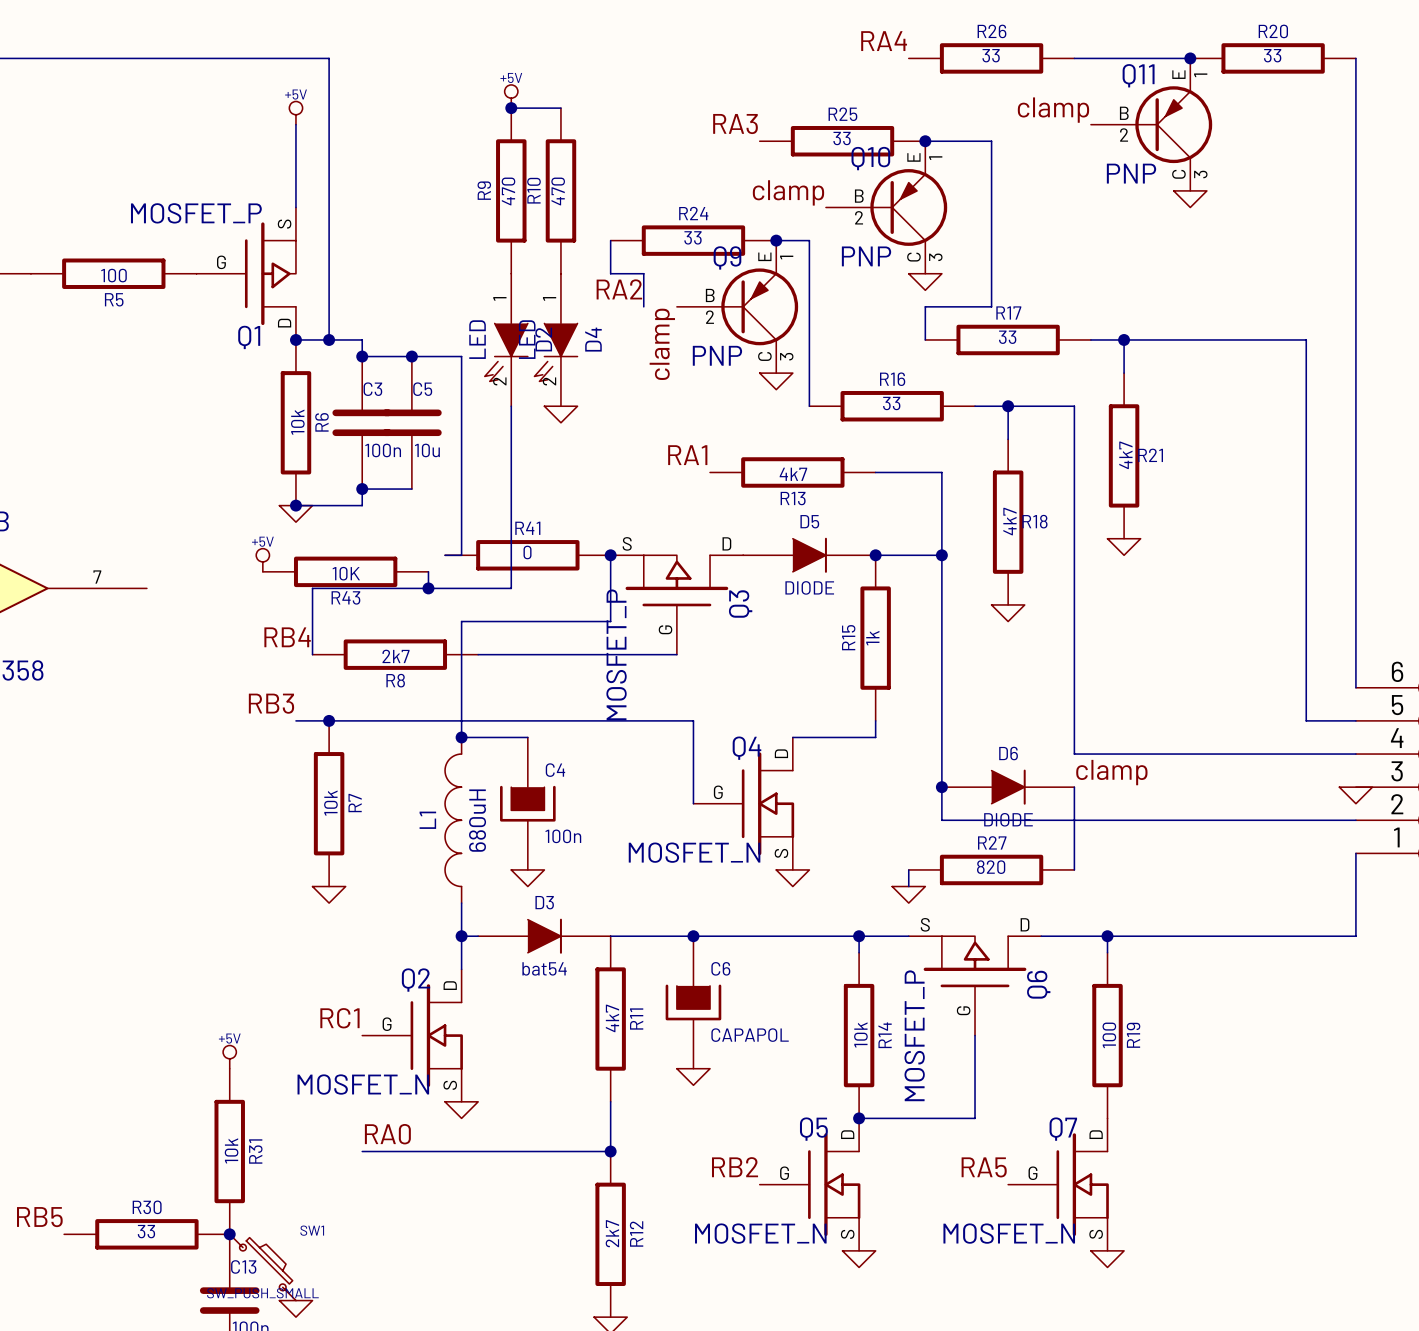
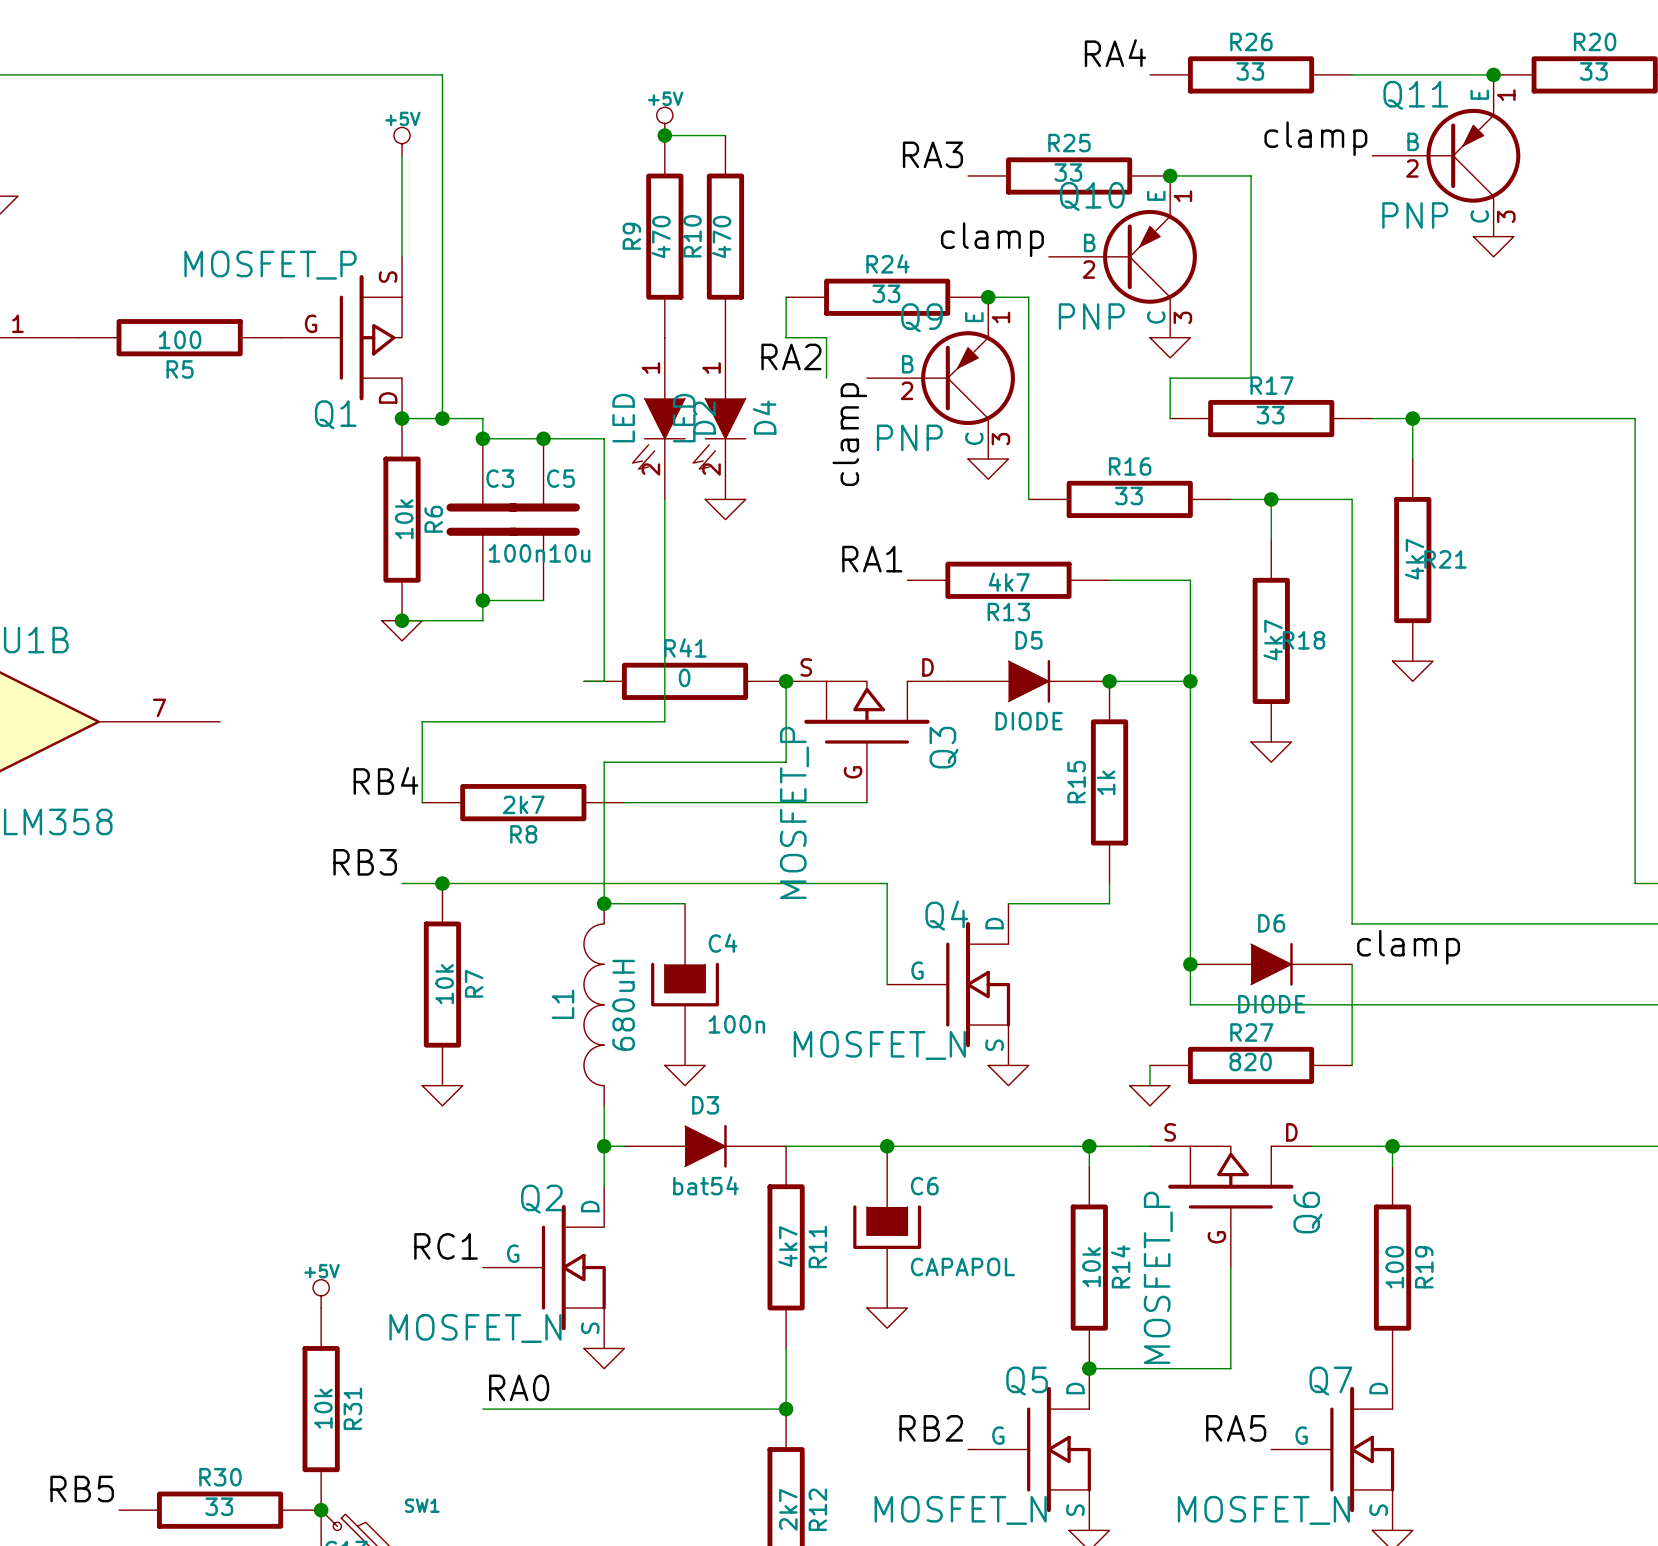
power symbol: +5V (262, 560) -> none
R43: 10K (345, 571) -> none
wire: (428, 571) (428, 588) -> none
junction: (428, 588) -> none

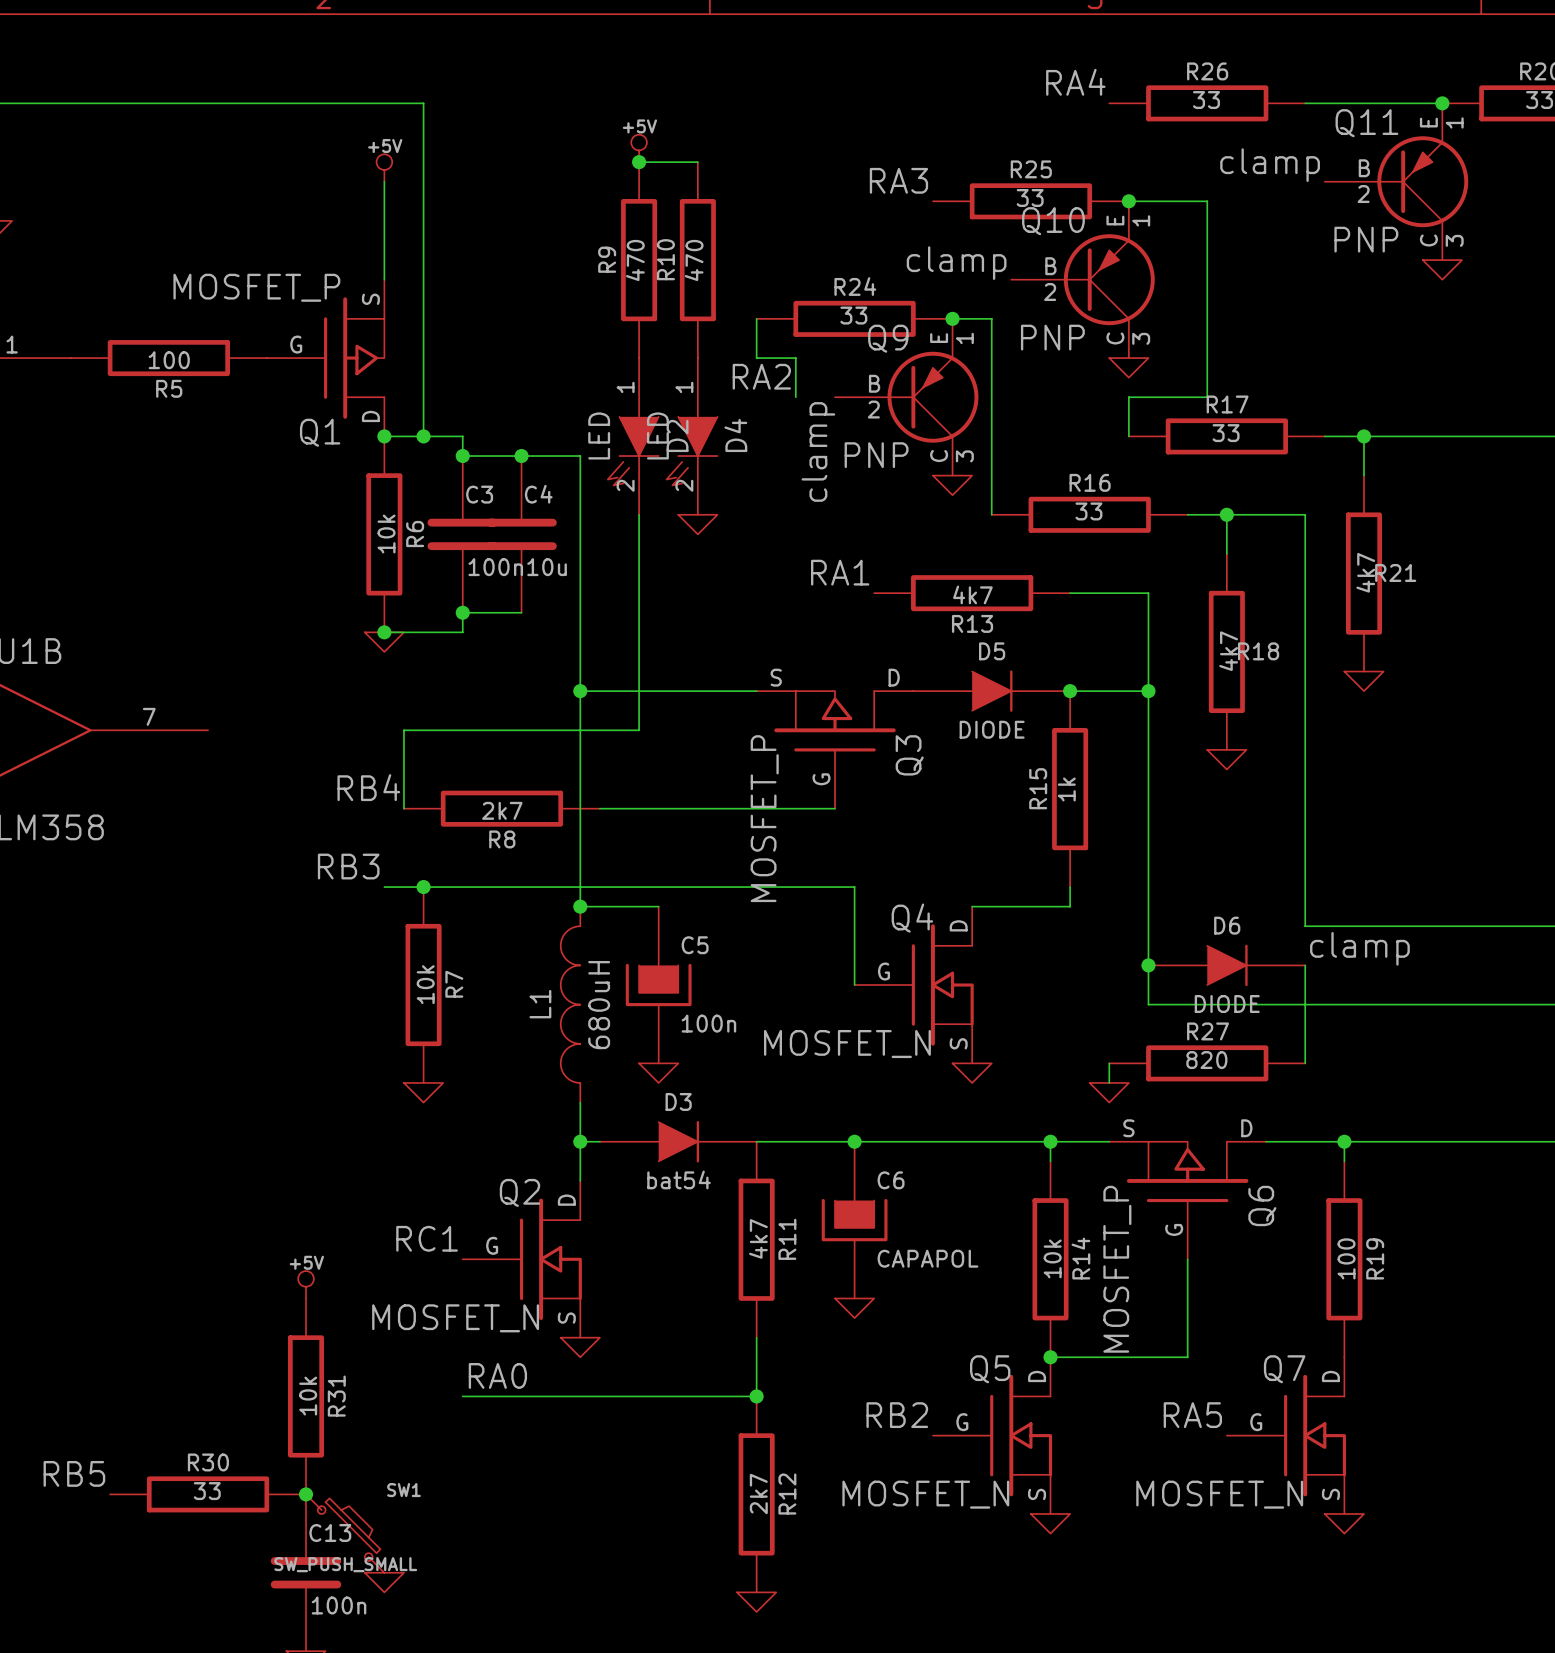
C5 name: C5 (560, 478) -> C4 (538, 494)
wire: (583, 681) (604, 681) -> none
junction: none -> (580, 691)
R41: 0 (685, 681) -> none
wire: (786, 681) (786, 762) (604, 762) -> (756, 691) (580, 691) (580, 769)
junction: (786, 681) -> none
C4 name: C4 (723, 943) -> C5 (695, 945)

